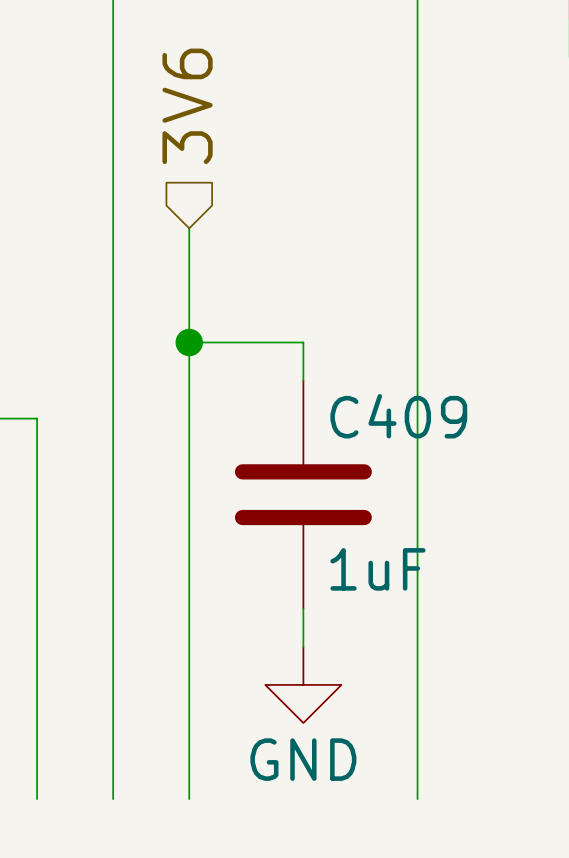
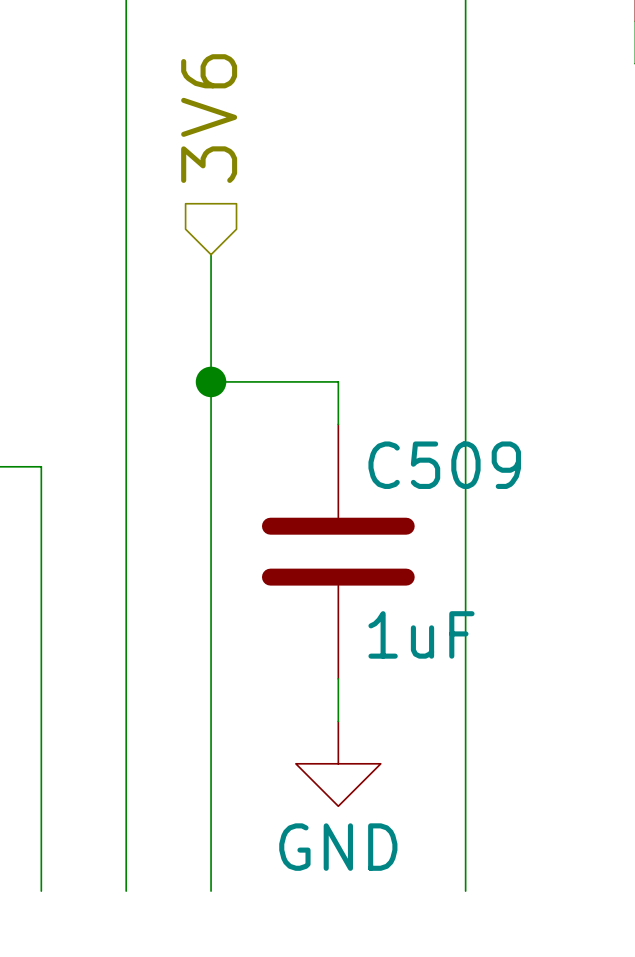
C409 name: C409 (398, 416) -> C509 (444, 465)

